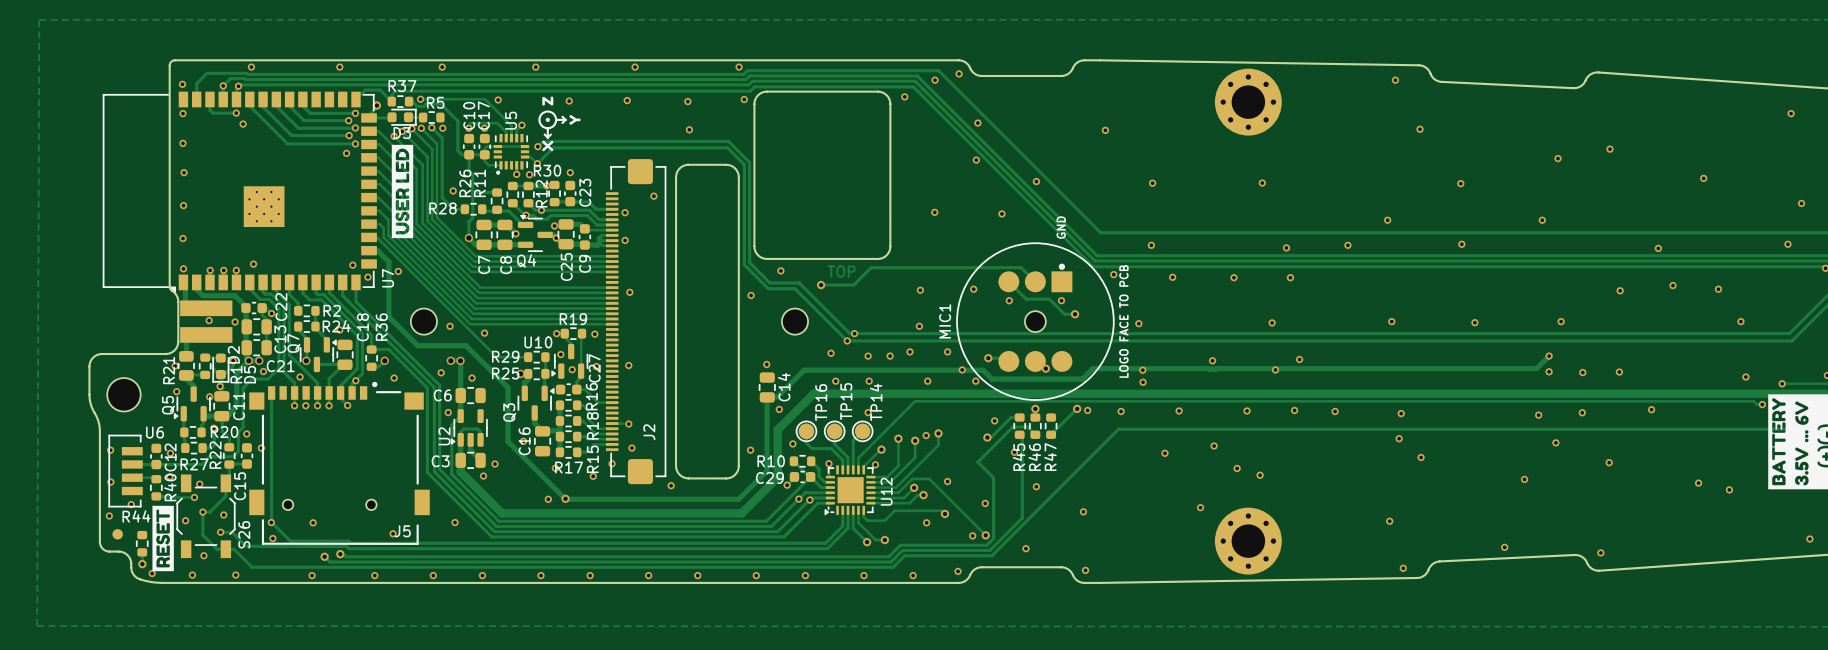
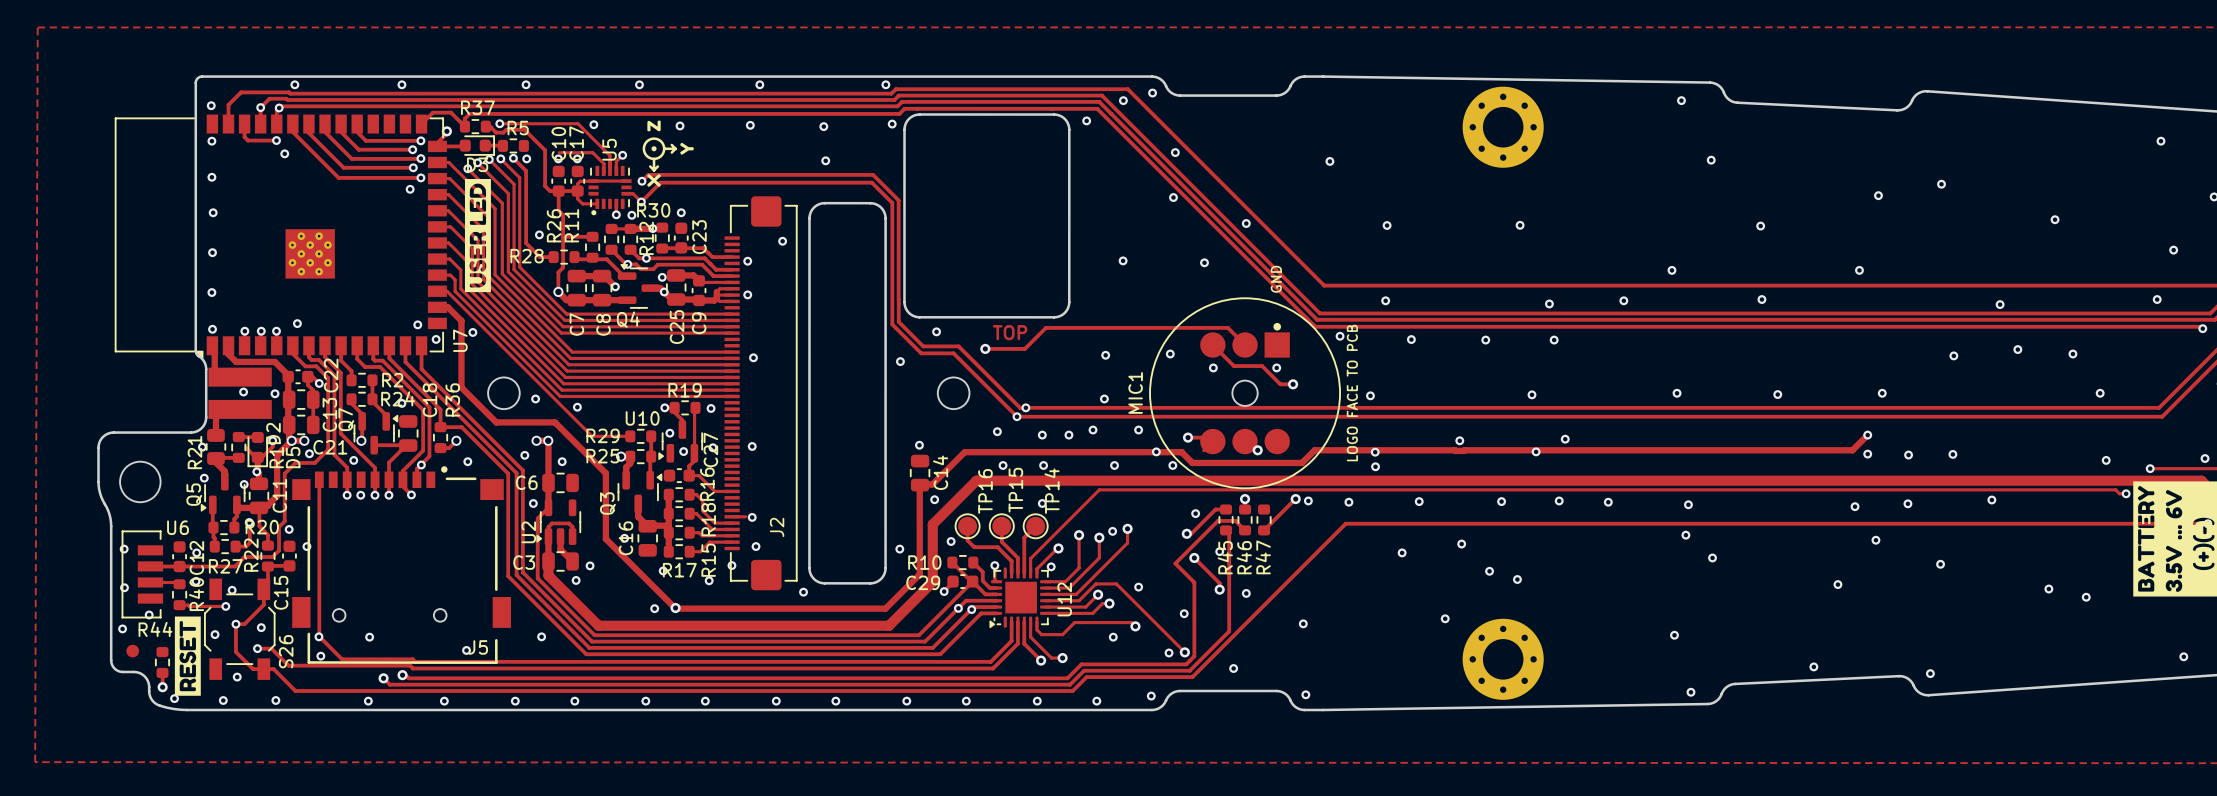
track: none -> (1194, 557) (1219, 583) (1219, 589)
via: none -> (1194, 557)
via: none -> (1219, 589)

